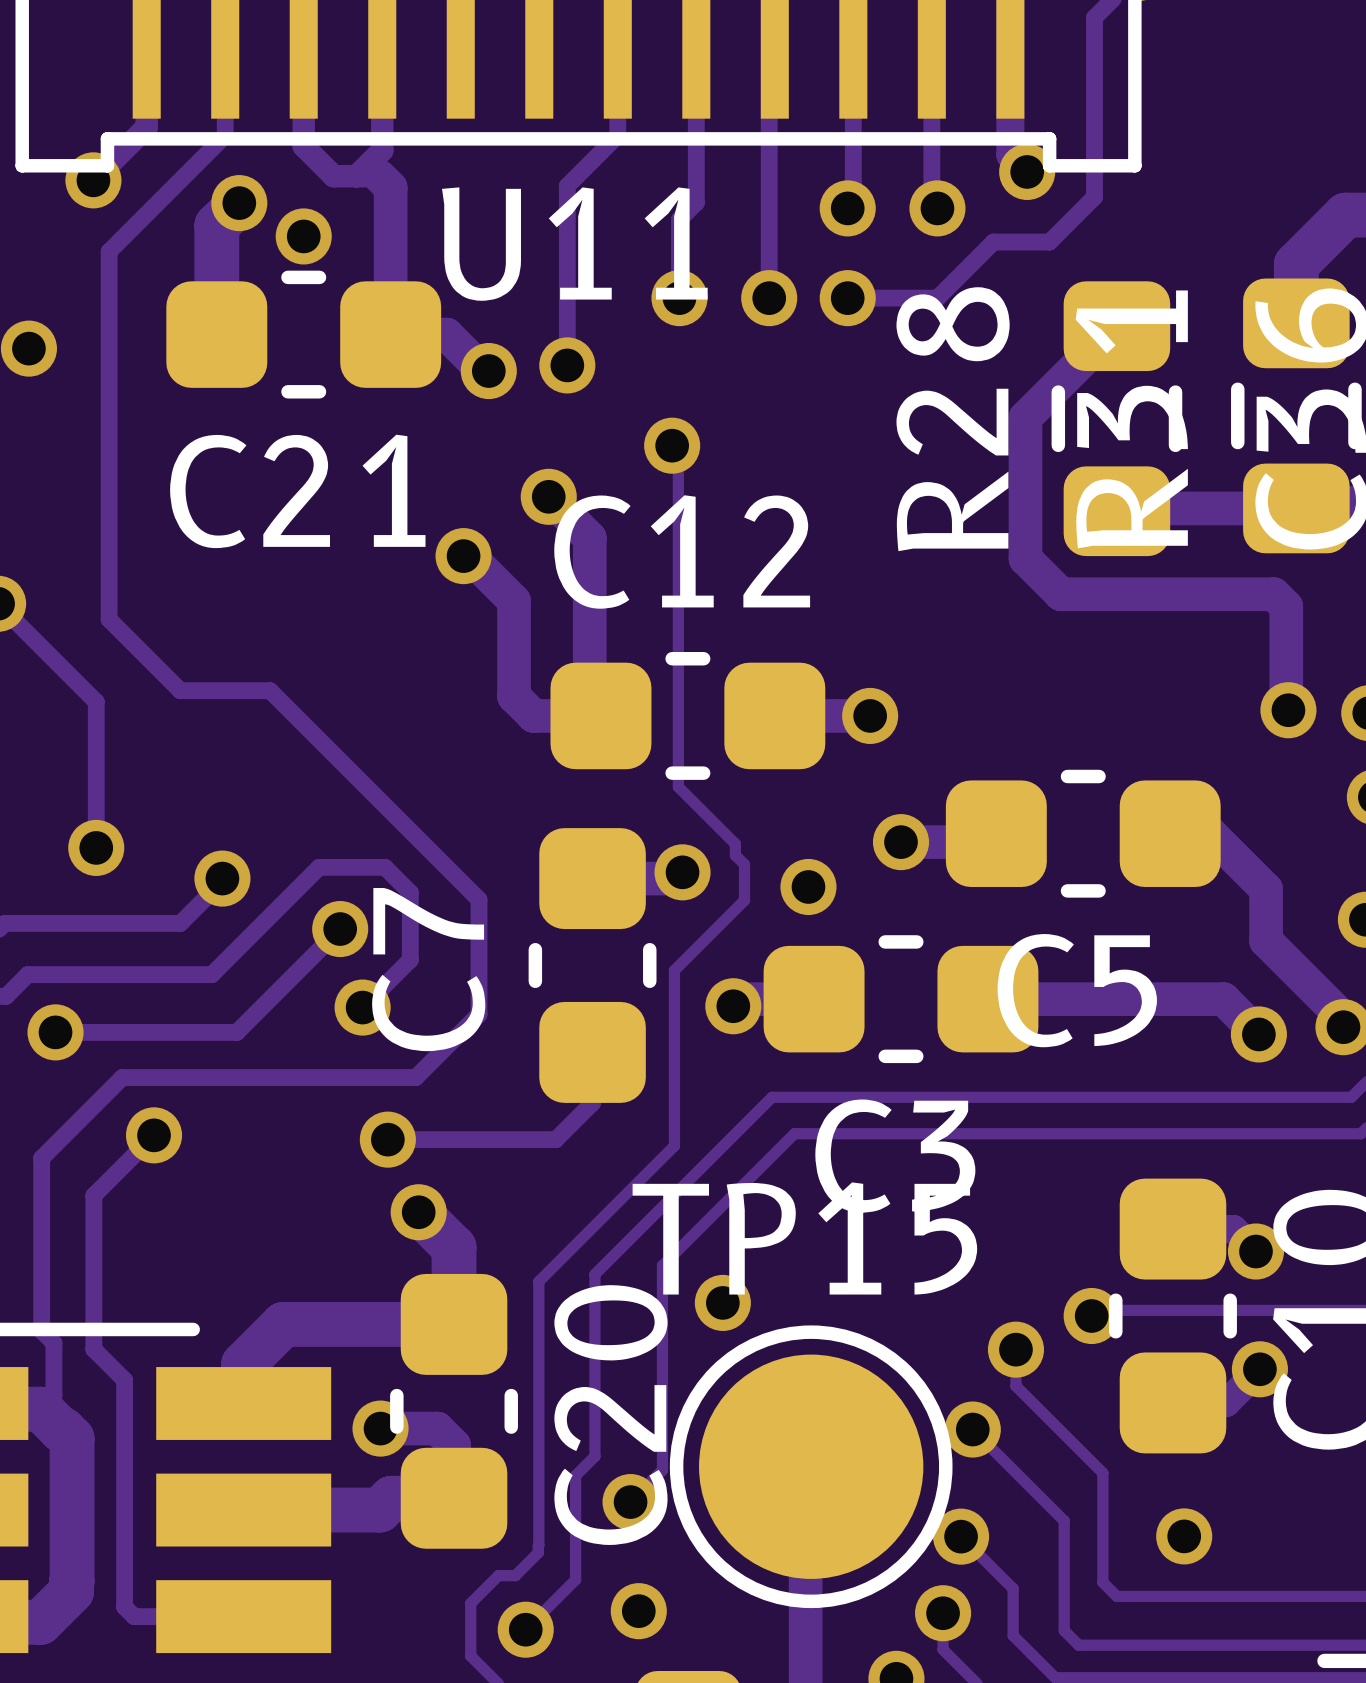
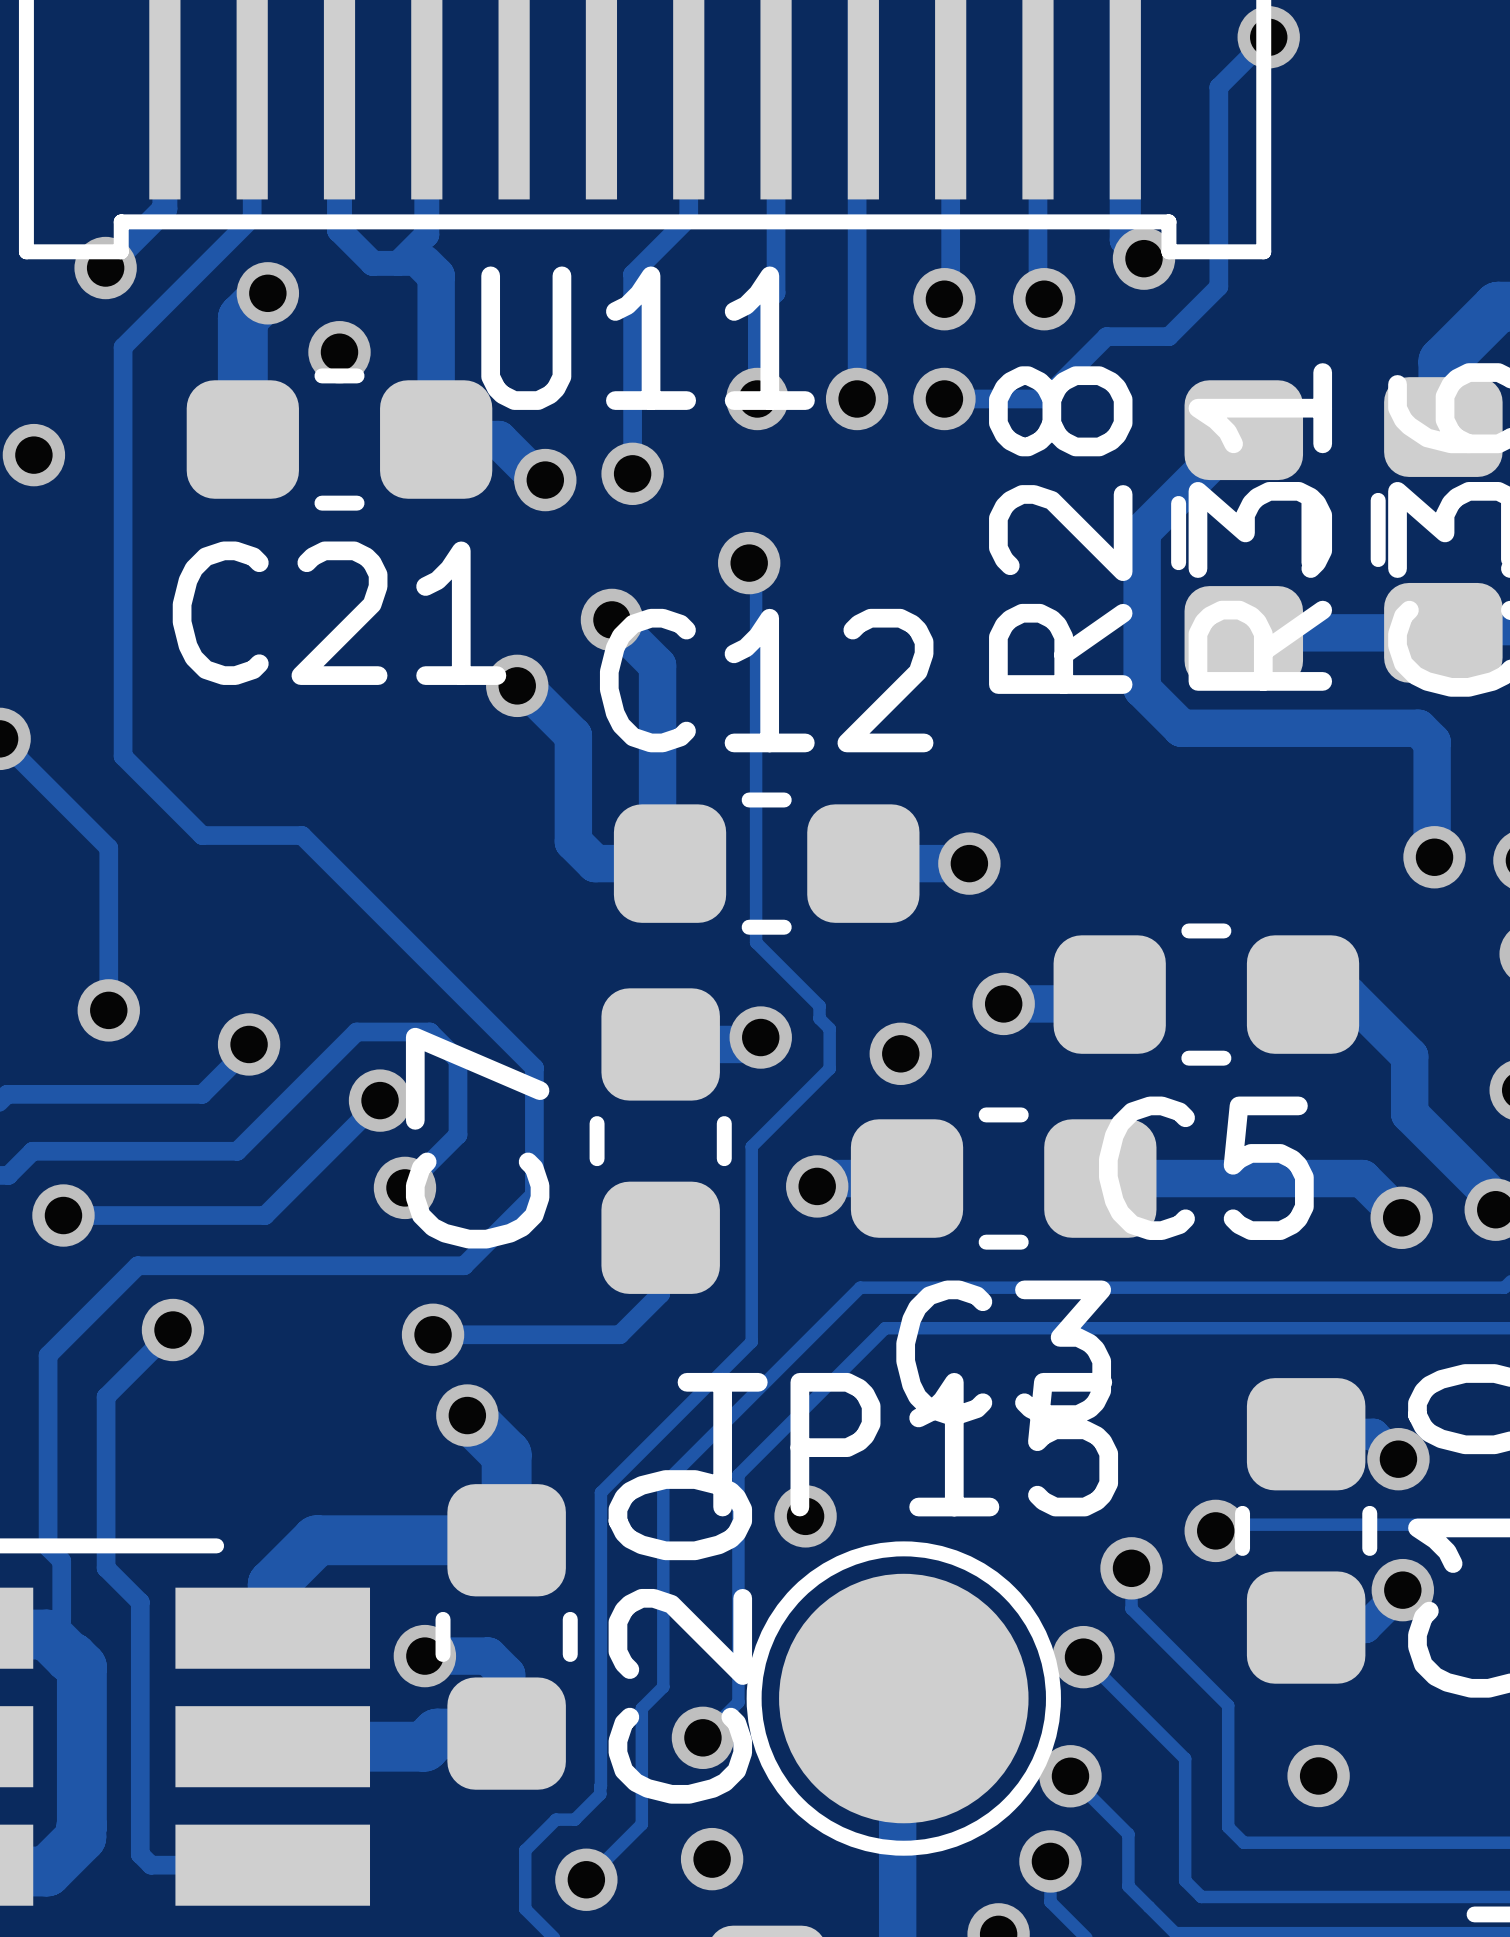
via position: (303, 236) -> (339, 352)

